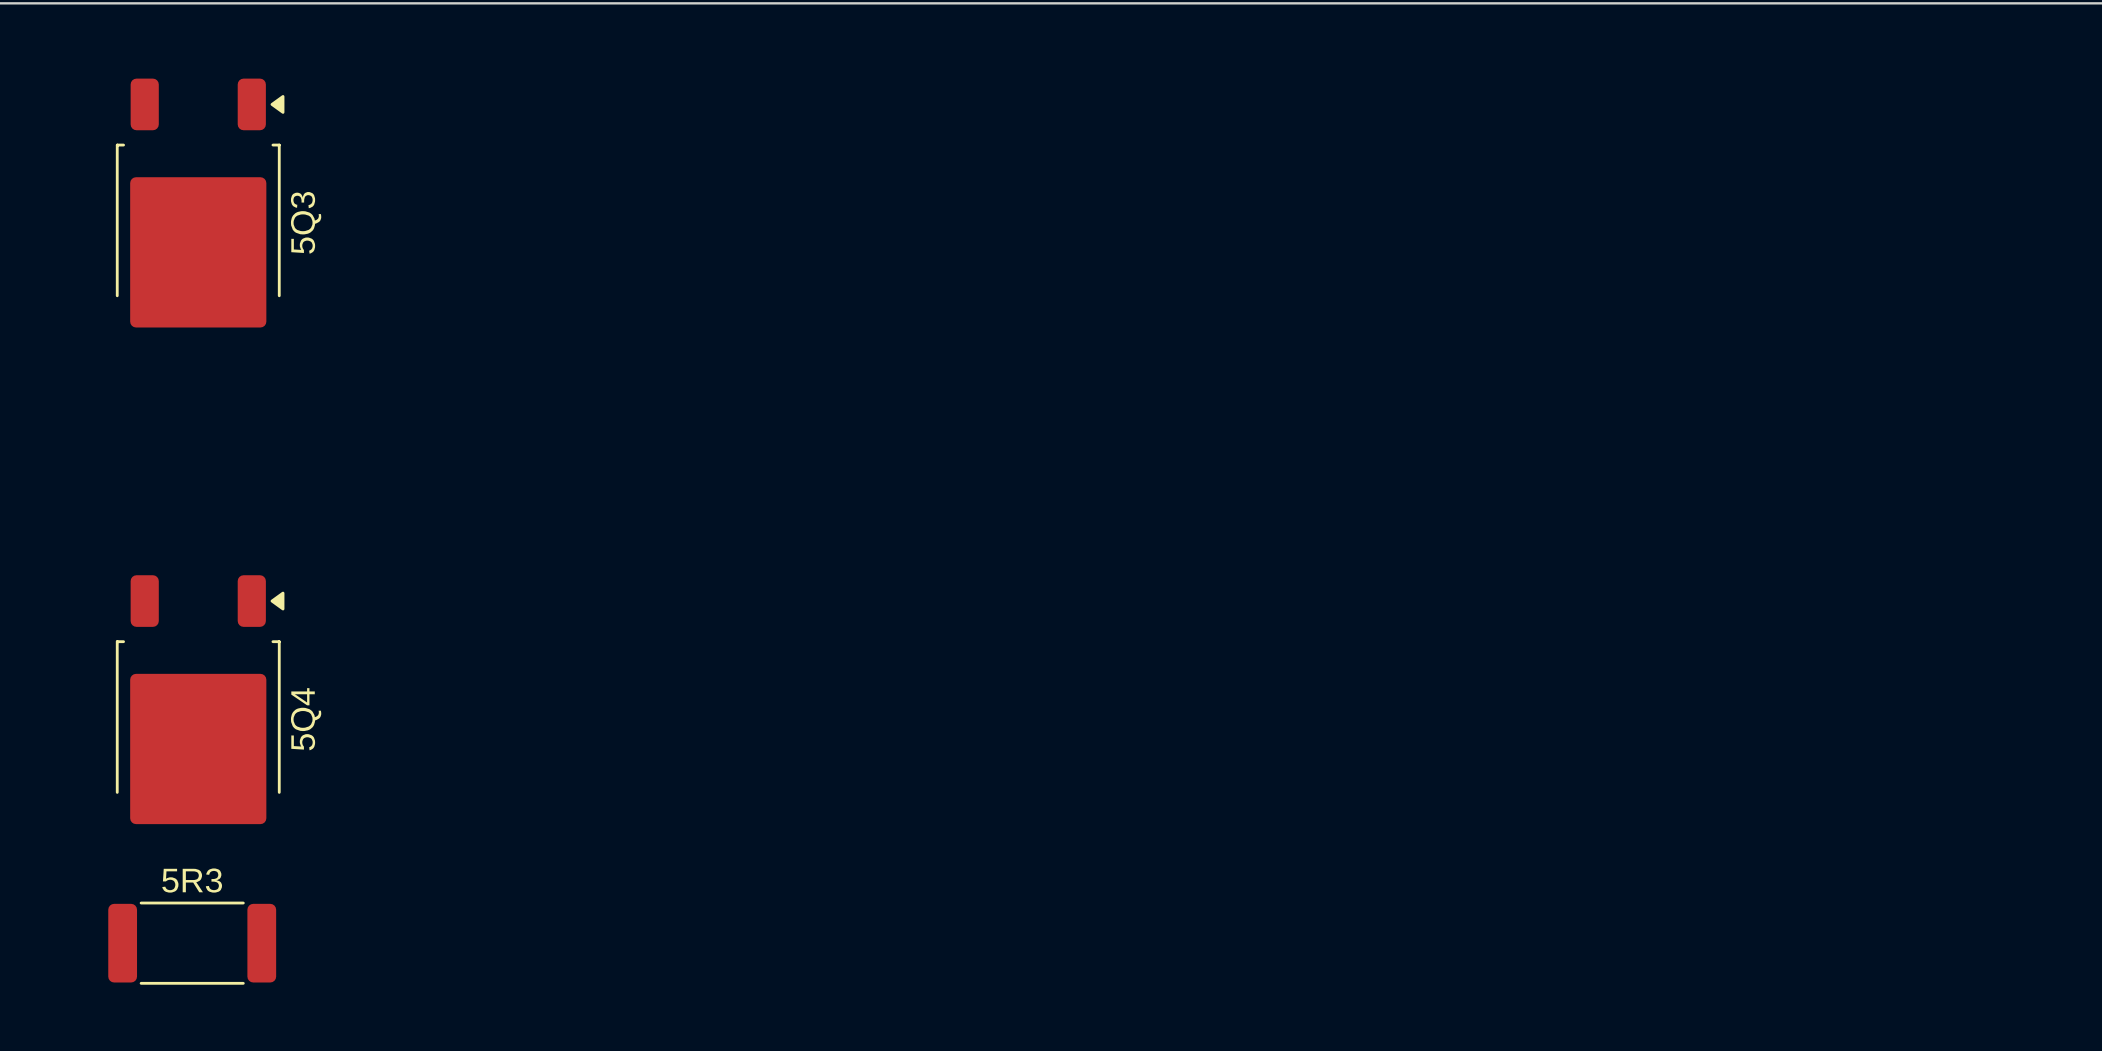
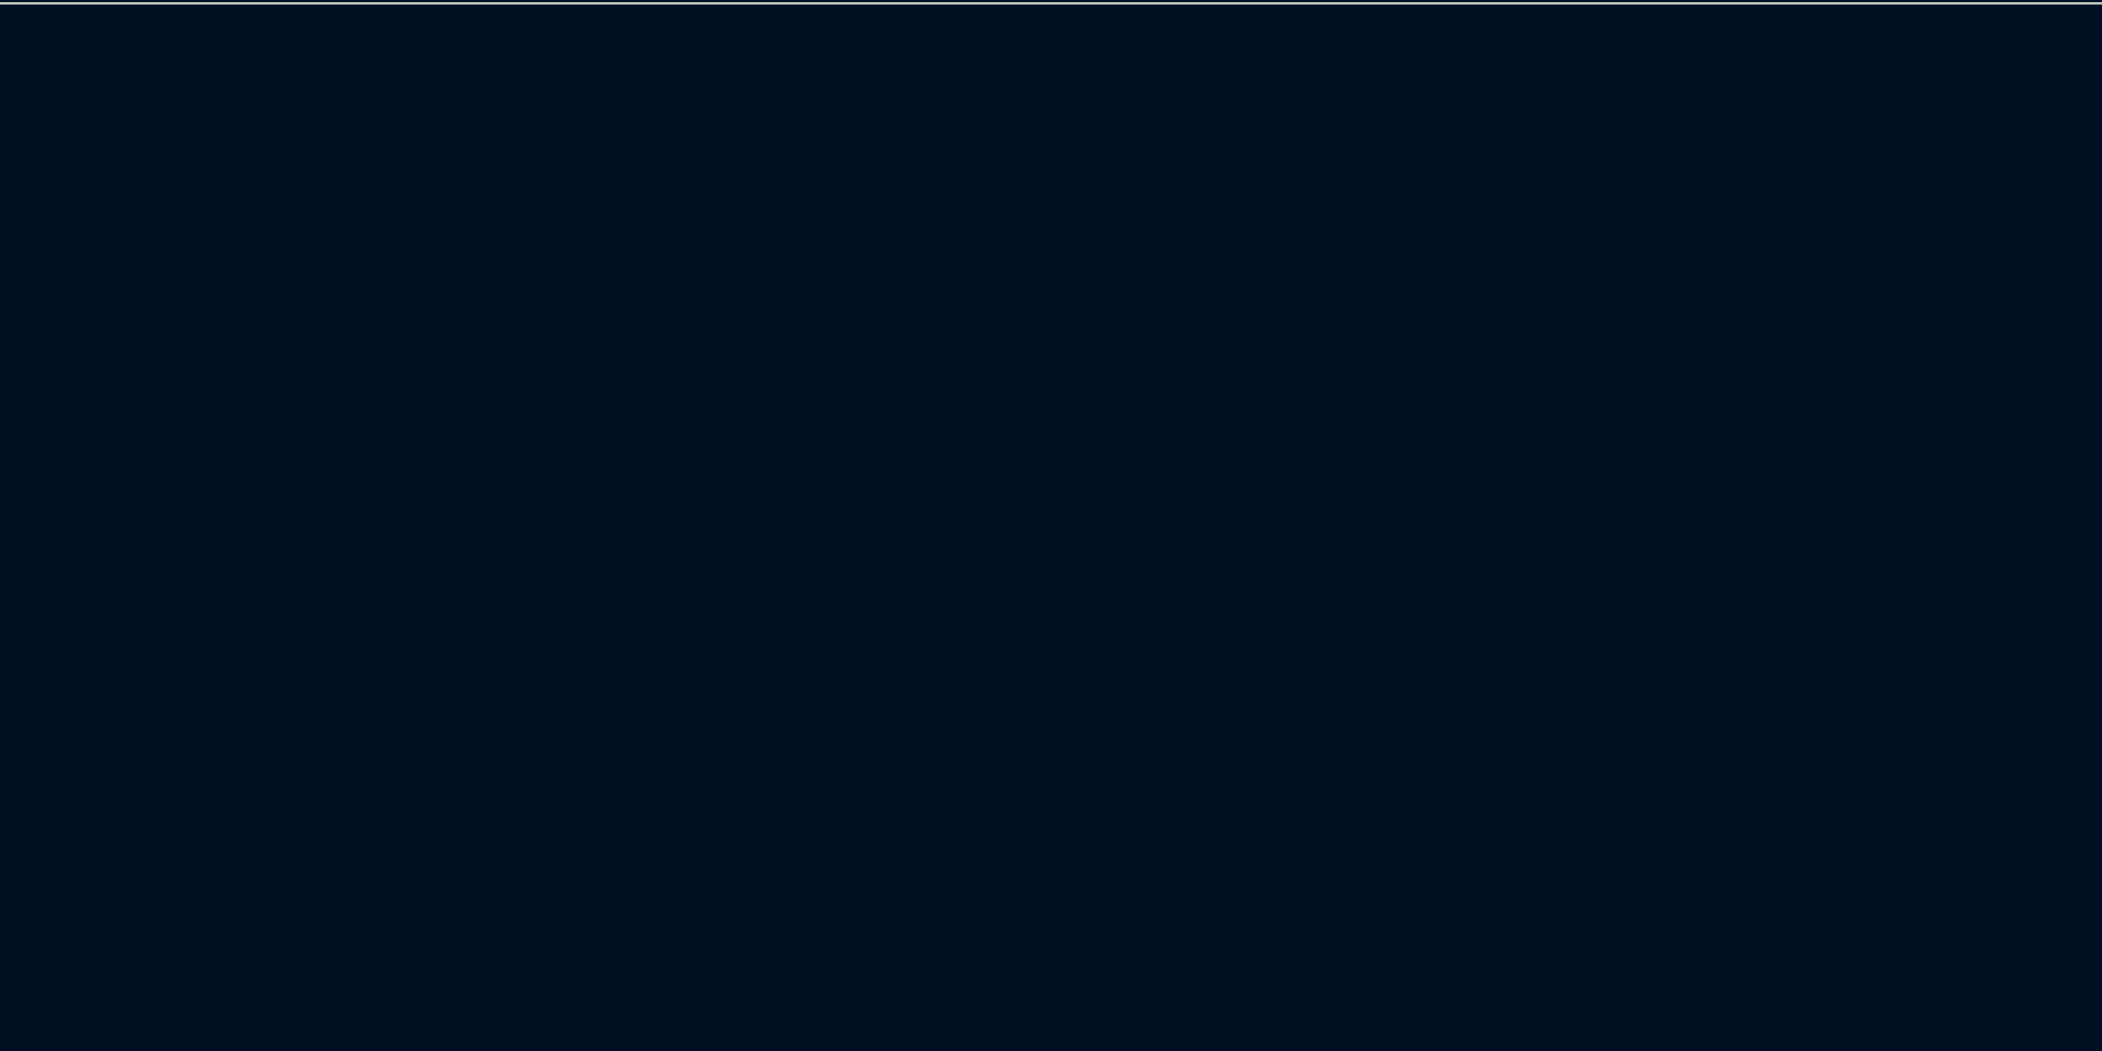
5Q3: (200, 203) -> none
5Q4: (200, 699) -> none
5R3: (192, 943) -> none

